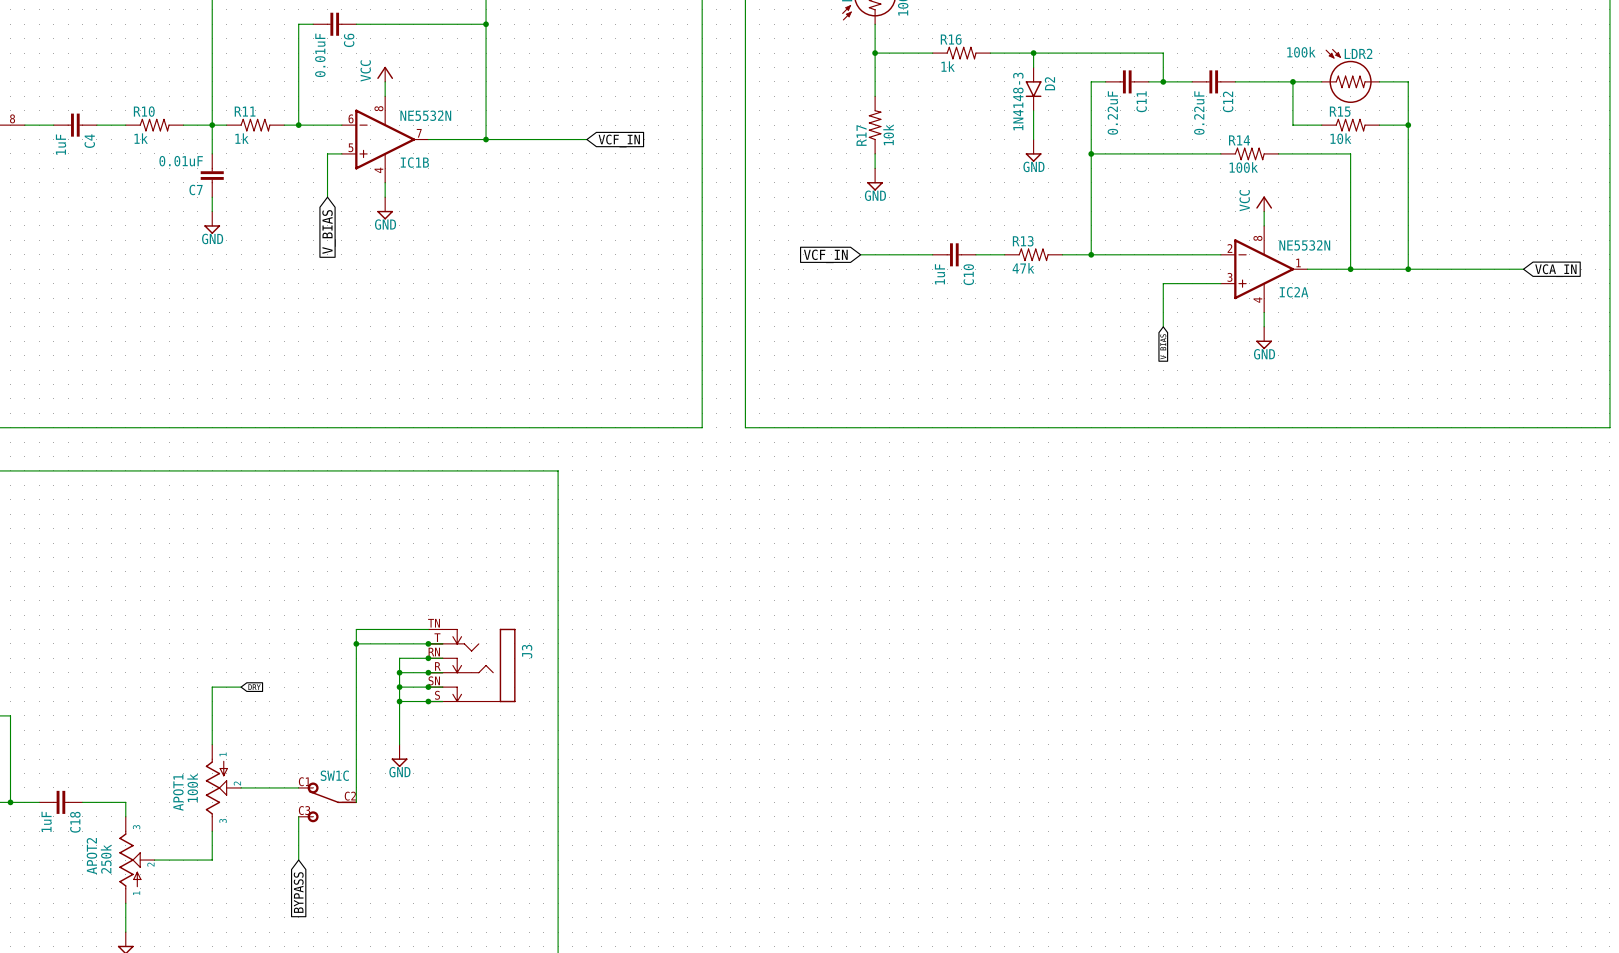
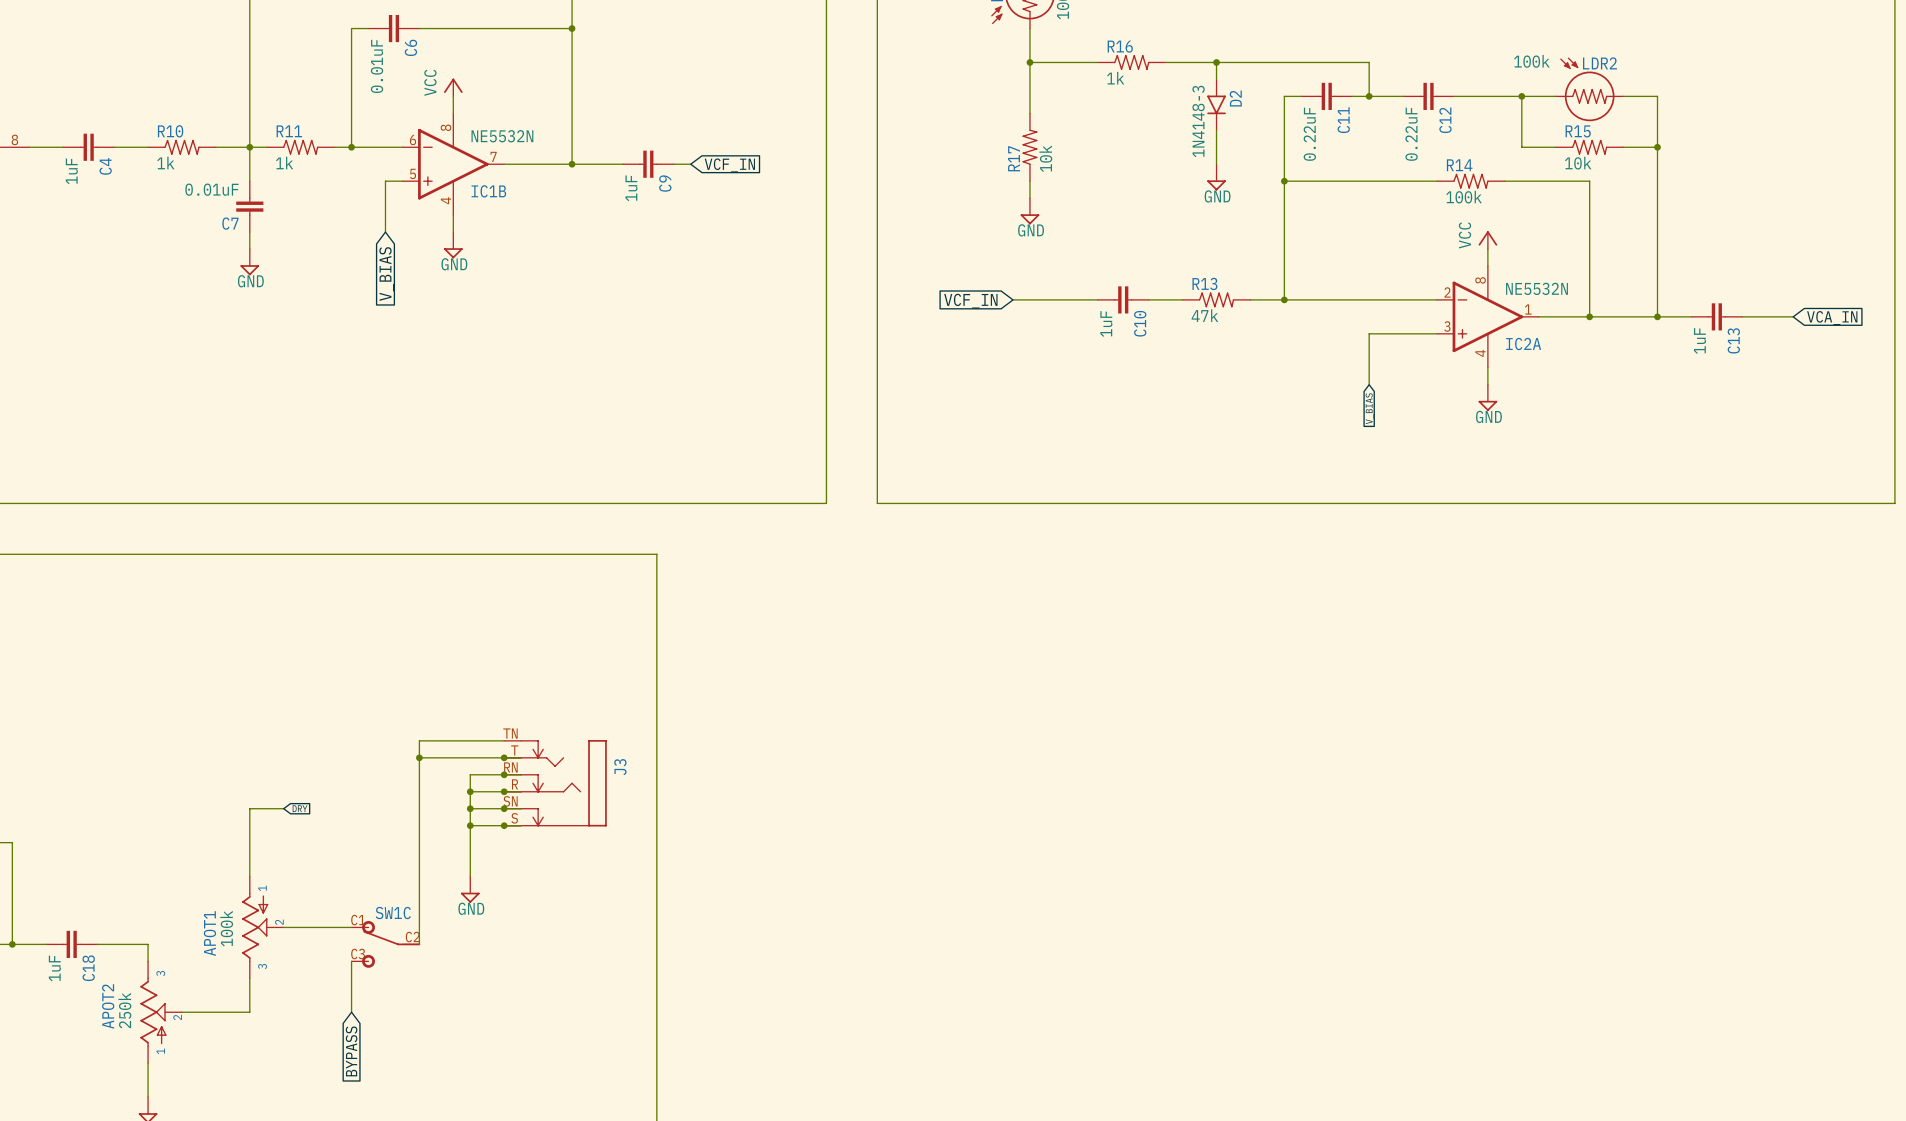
C9: none -> 1uF (648, 164)
C13: none -> 1uF (1716, 316)

